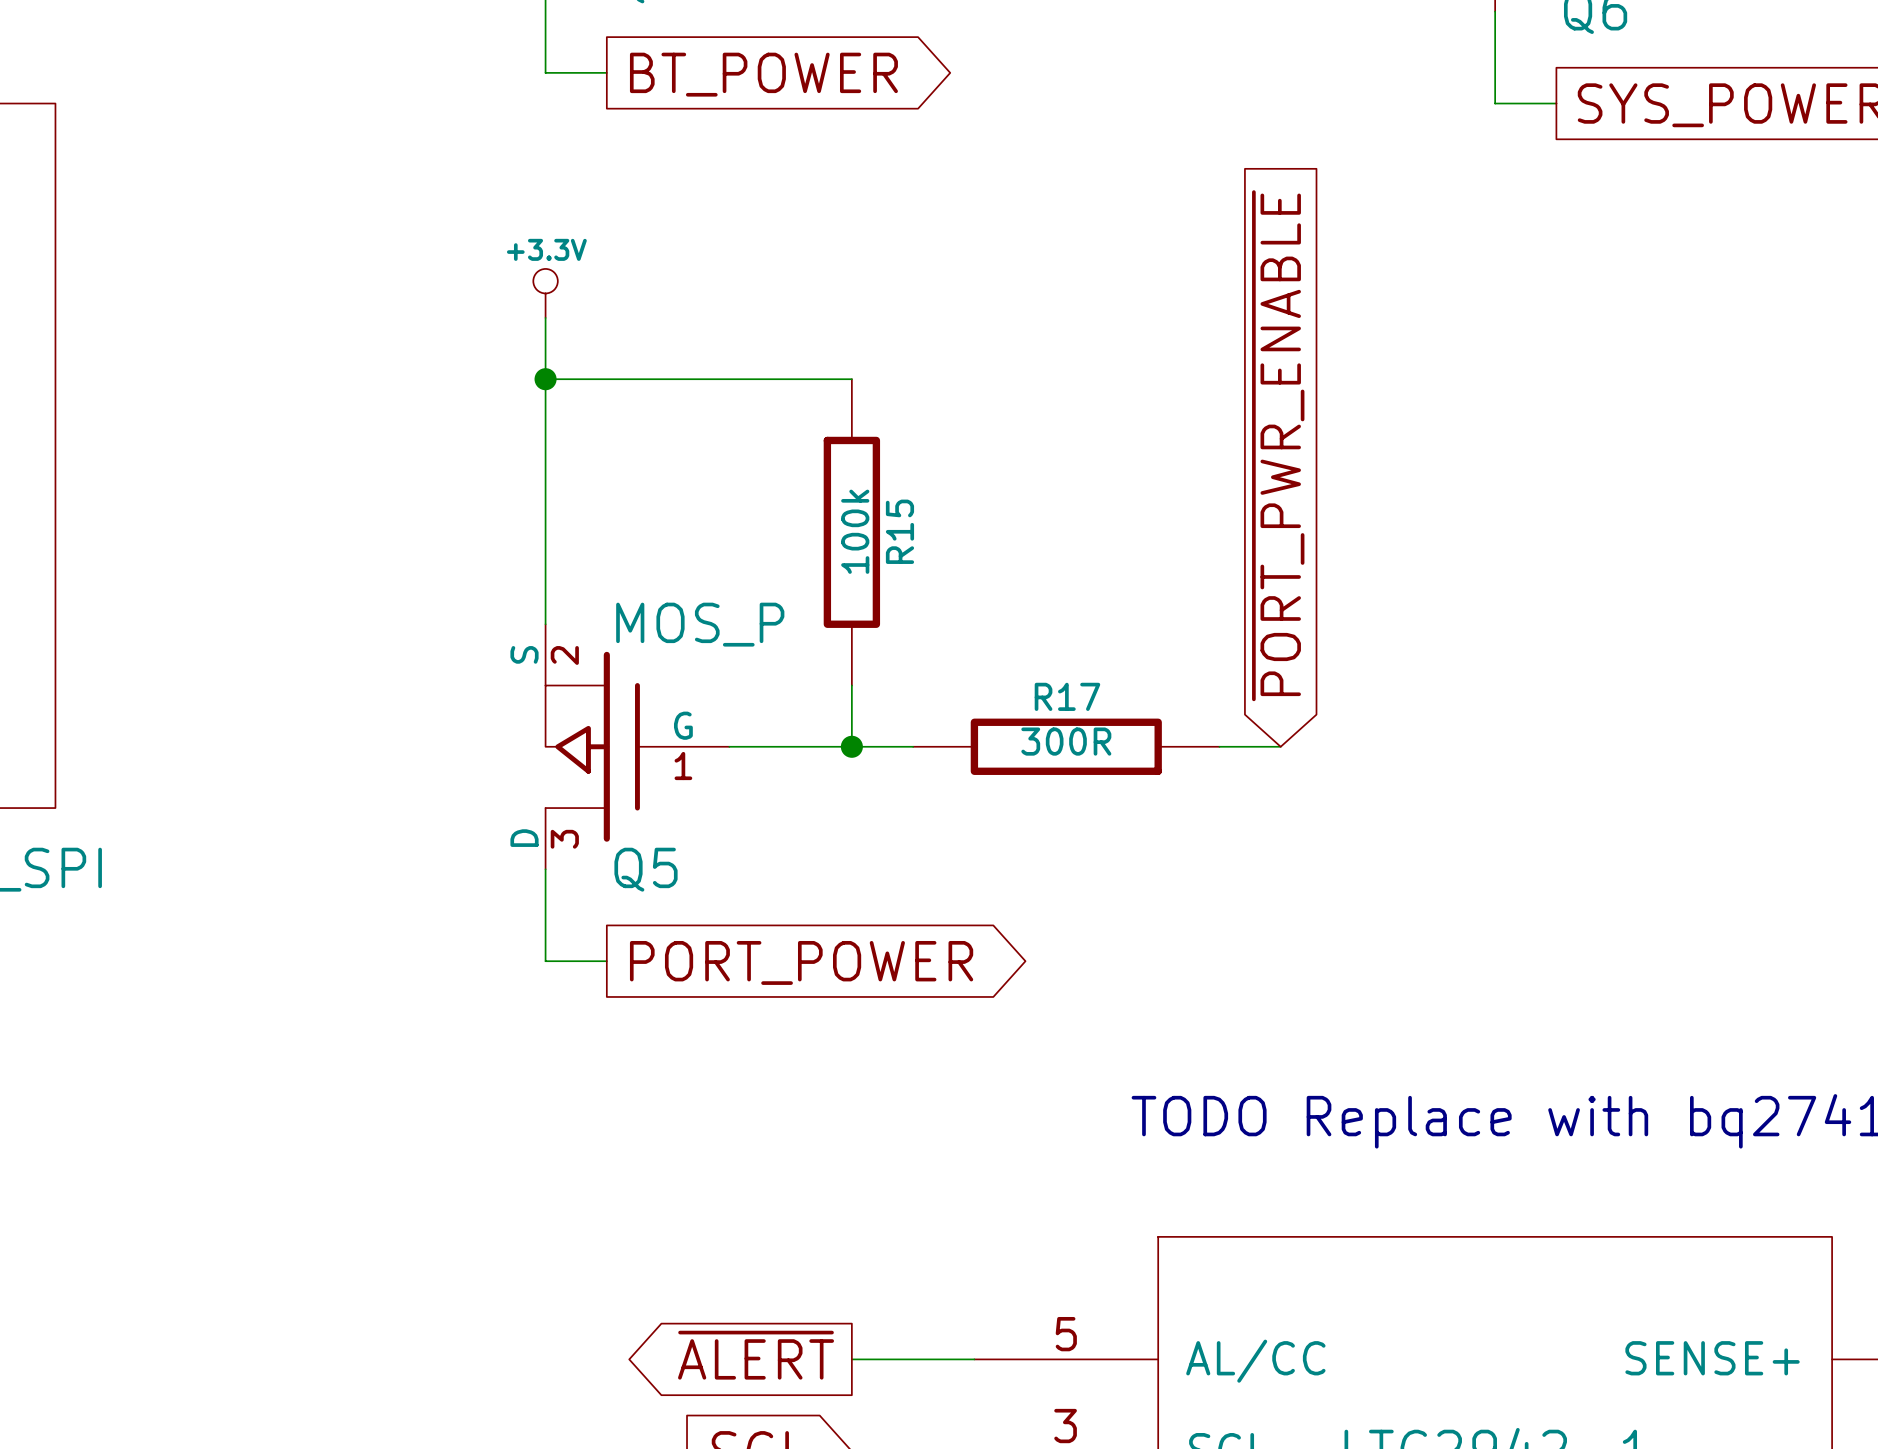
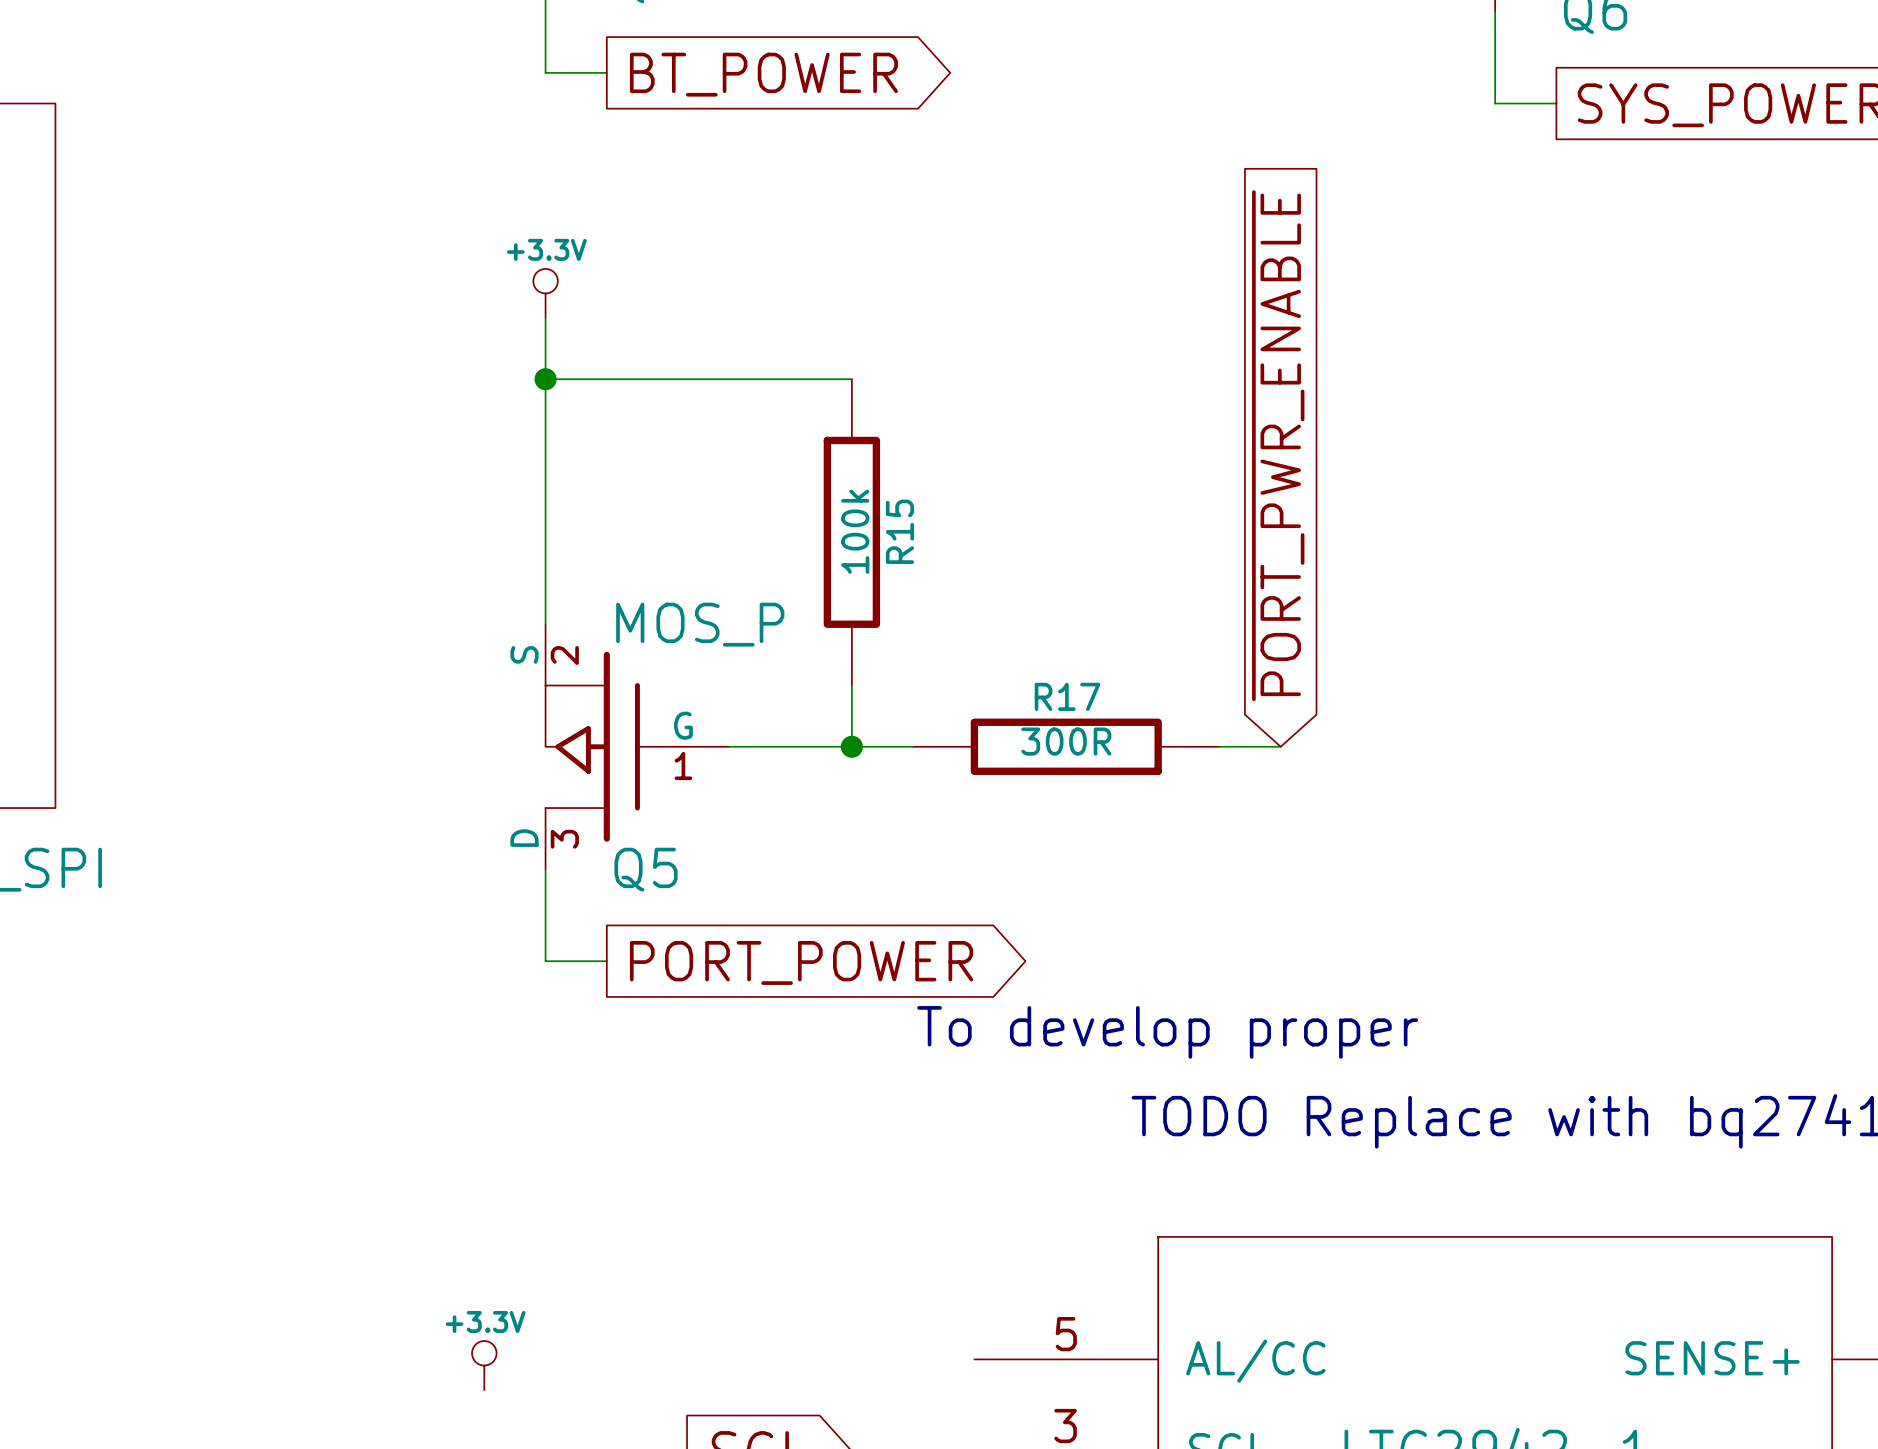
text: none -> To develop proper (1167, 1032)
global label: ~{ALERT} (756, 1355) -> none
wire: (851, 1359) (974, 1359) -> none
power symbol: none -> +3.3V (484, 1365)

